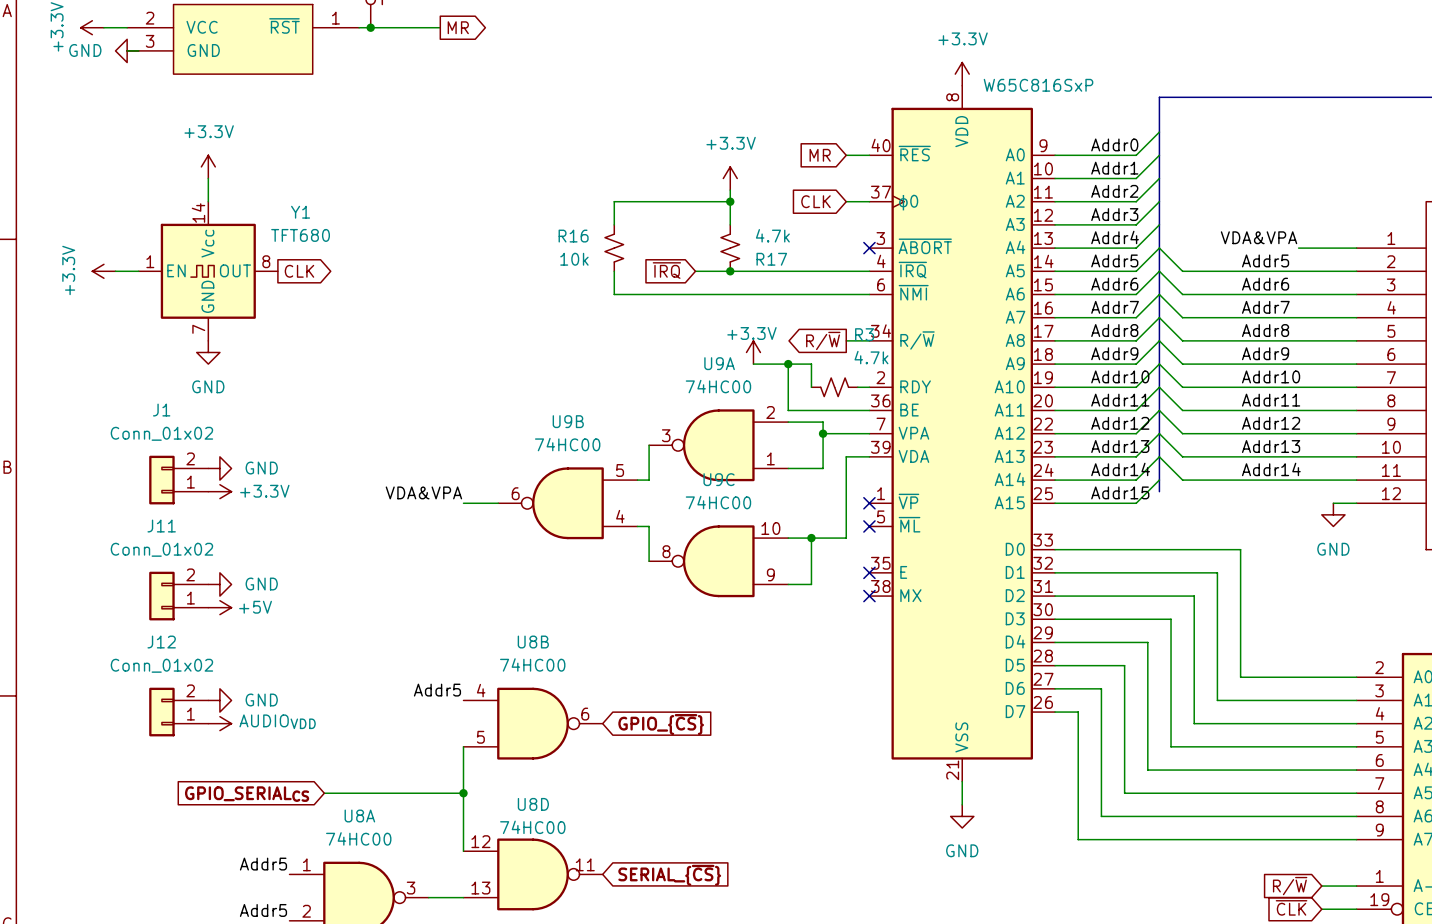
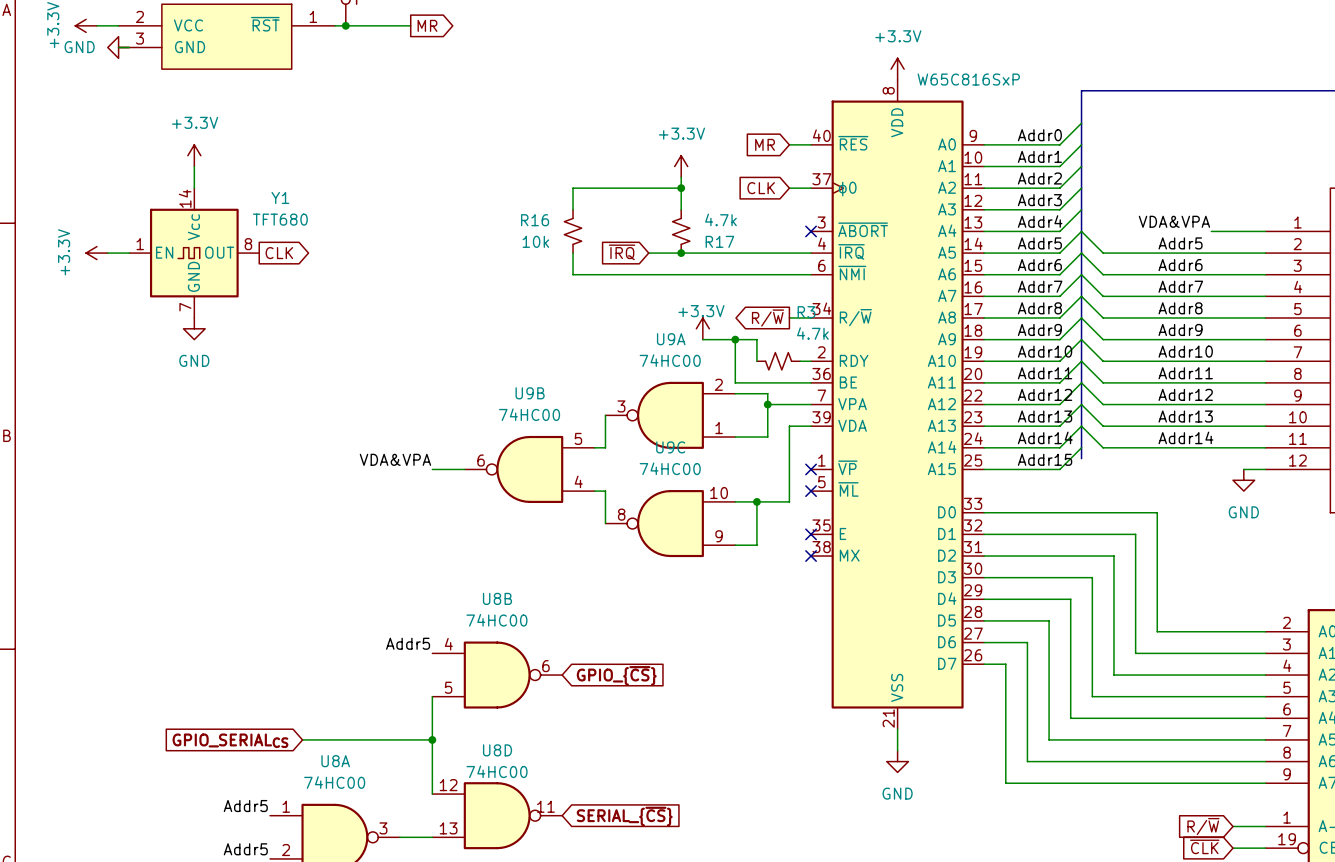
power symbol: GND (219, 468) -> none
J1: Conn_01x02 (178, 480) -> none
power symbol: +3.3V (219, 491) -> none
power symbol: GND (219, 584) -> none
J11: Conn_01x02 (178, 596) -> none
power symbol: +5V (219, 607) -> none
power symbol: GND (219, 700) -> none
J12: Conn_01x02 (178, 712) -> none
power symbol: AUDIOVDD (219, 723) -> none

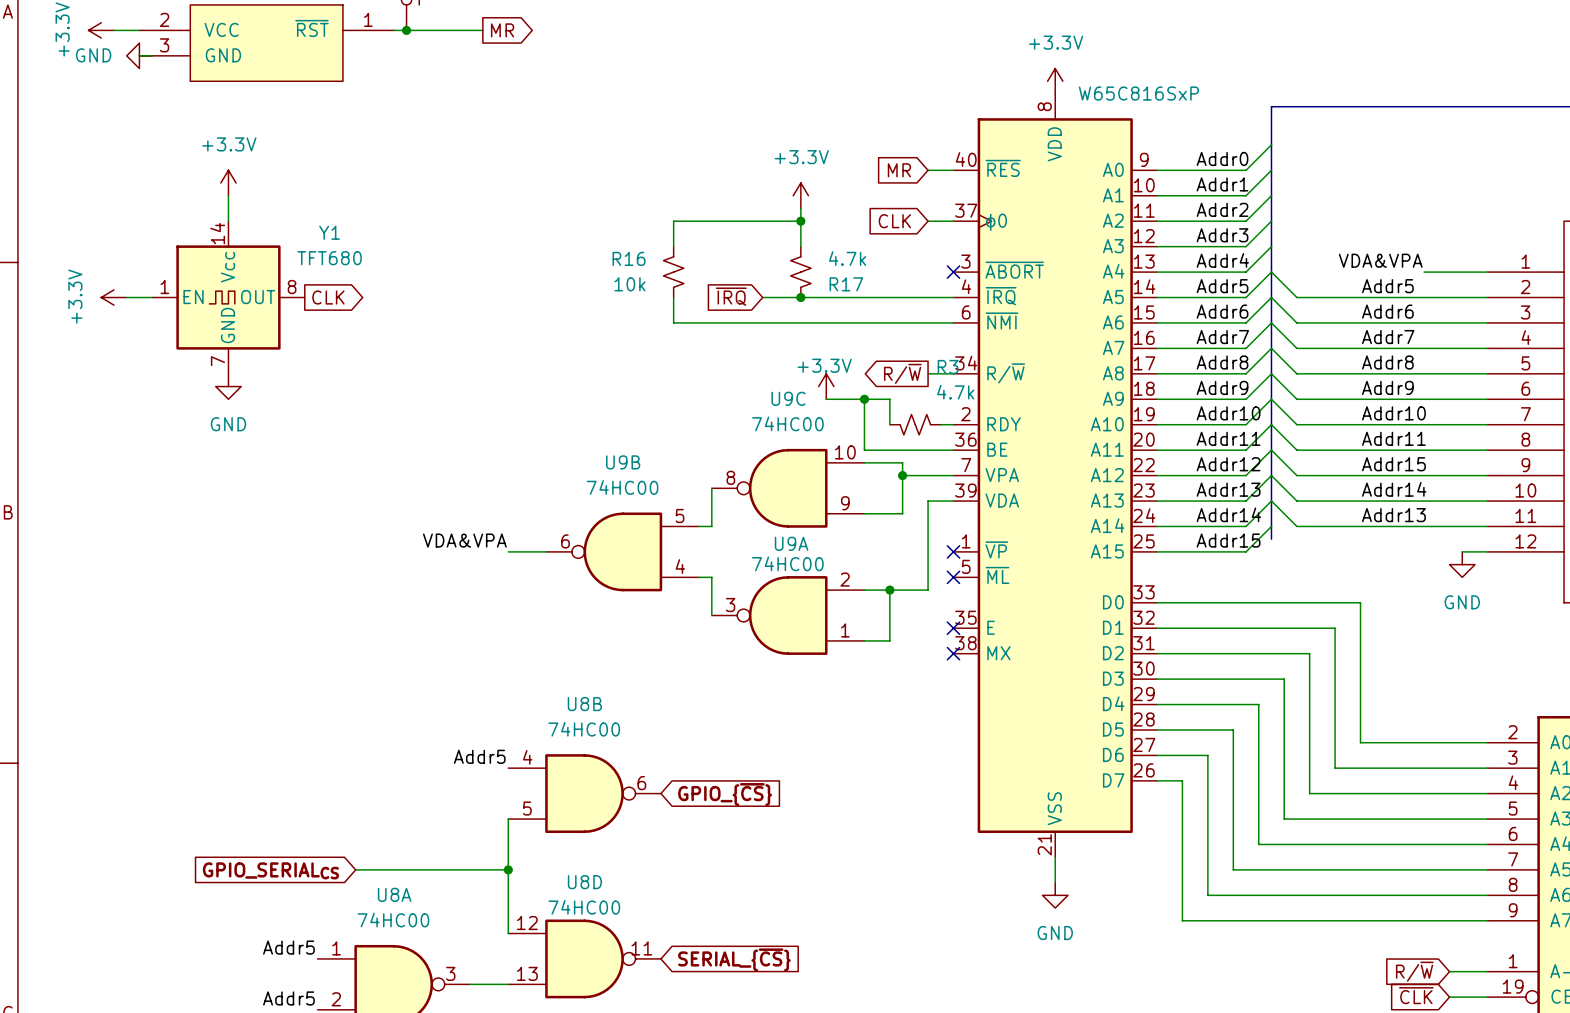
U9A name position: U9A (671, 339) -> U9A (791, 543)
U9A value position: 74HC00 (670, 360) -> 74HC00 (787, 563)
label: Addr12 (1185, 394) -> Addr15 (1393, 464)
U9A position: (670, 415) -> (788, 615)
label: Addr13 (1185, 416) -> Addr14 (1394, 489)
label: Addr14 (1185, 437) -> Addr13 (1393, 515)
U9C position: (670, 523) -> (788, 488)

